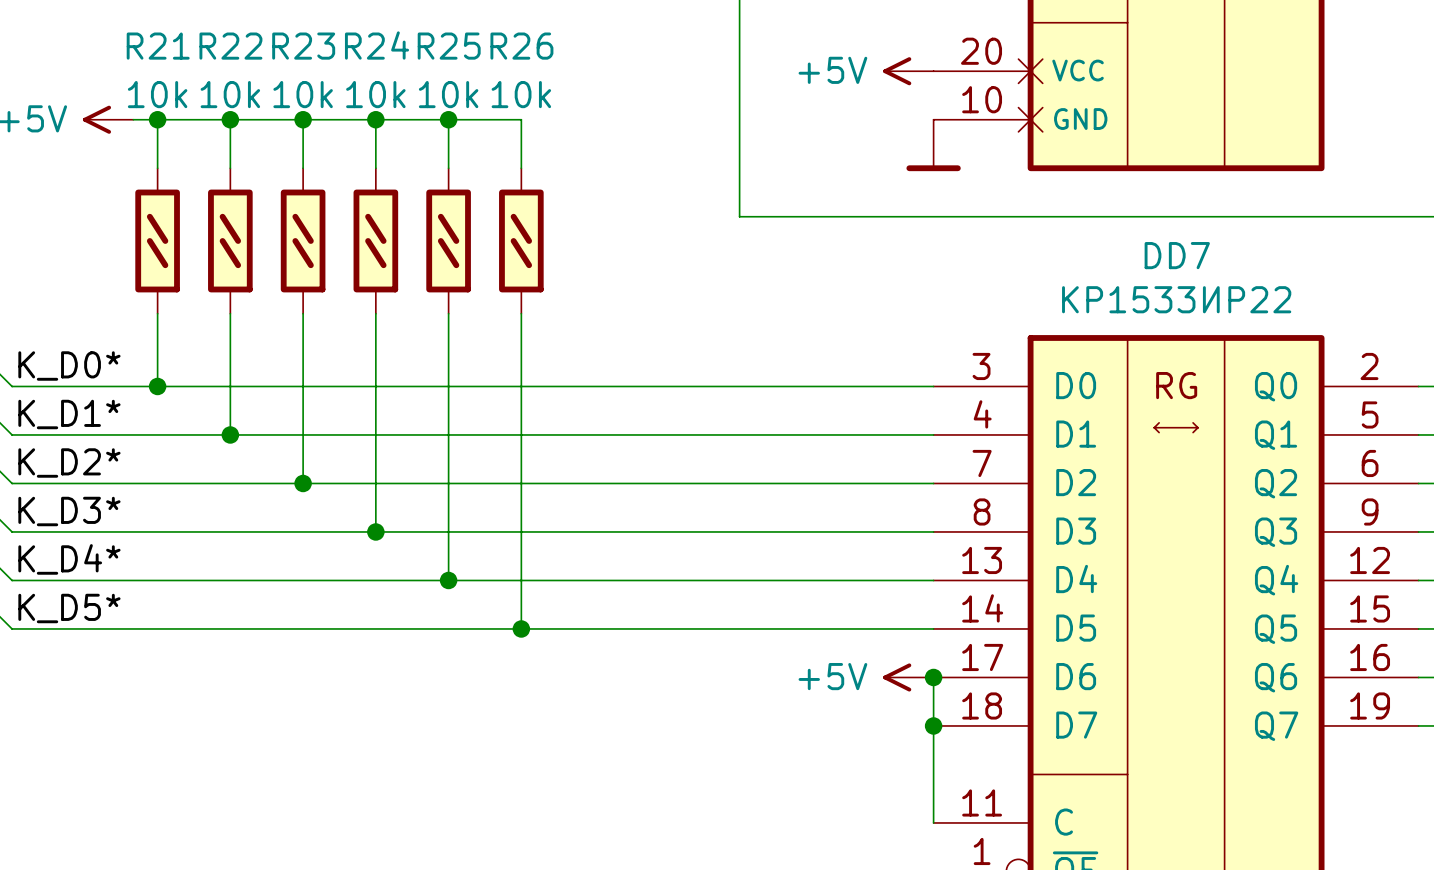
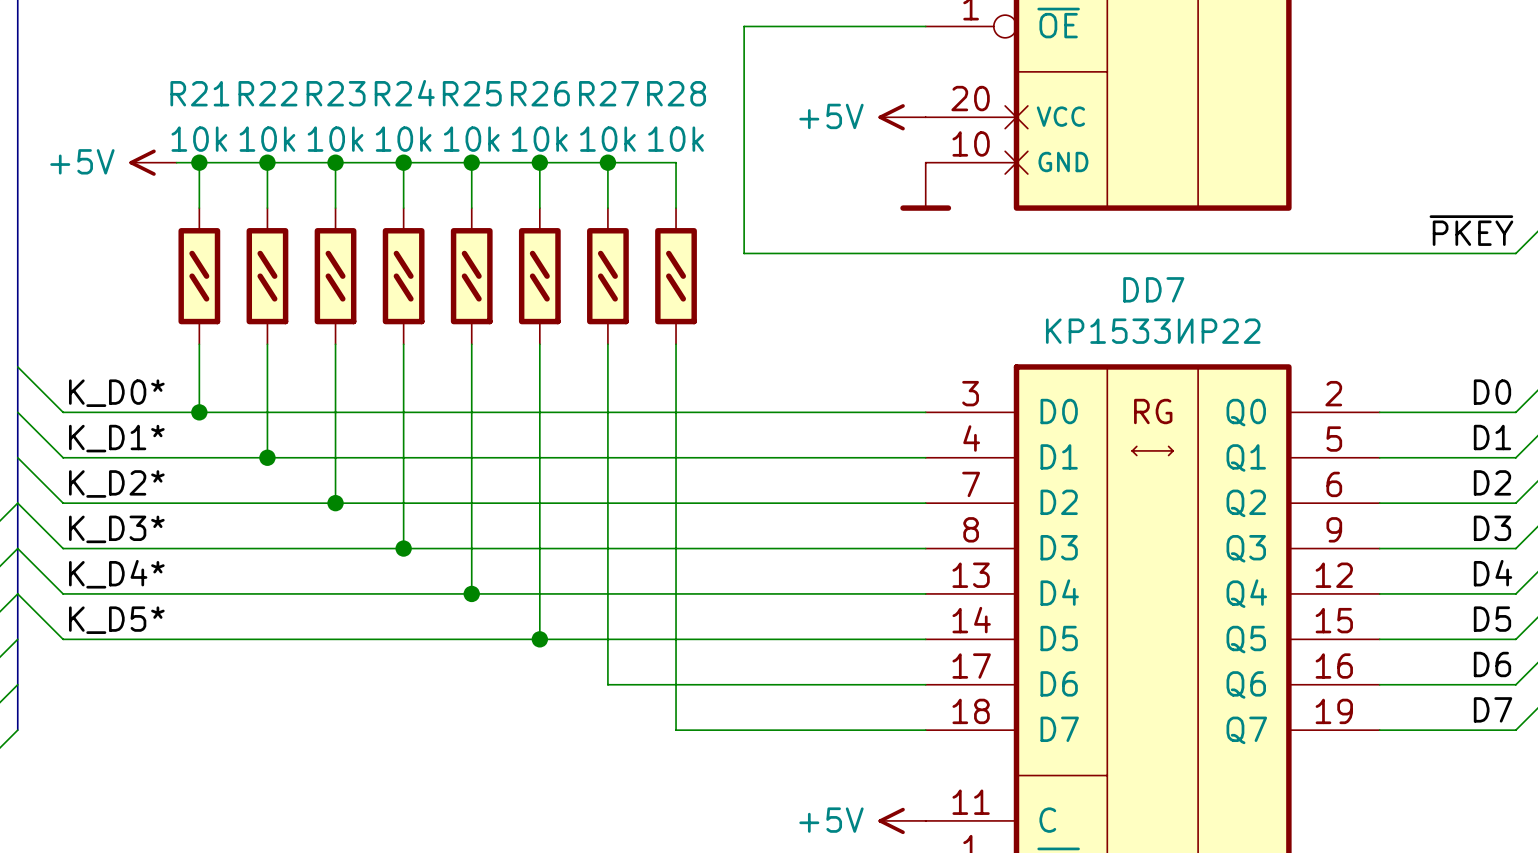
wire: none -> (539, 162) (676, 162) (676, 208)
junction: none -> (539, 162)
wire: none -> (607, 162) (607, 208)
junction: none -> (607, 162)
R27: none -> 10k (607, 276)
R28: none -> 10k (676, 276)
wire: none -> (676, 344) (676, 730) (925, 730)
power symbol position: +5V (908, 677) -> +5V (902, 820)
wire: (933, 677) (933, 822) -> (925, 684) (607, 684) (607, 344)
junction: (933, 677) -> none
junction: (933, 725) -> none

